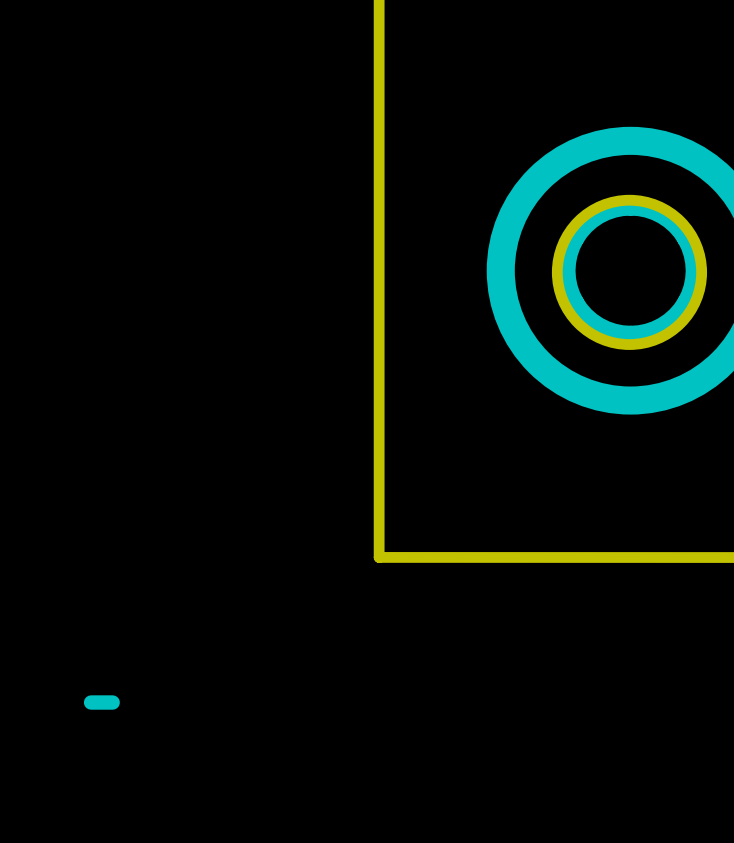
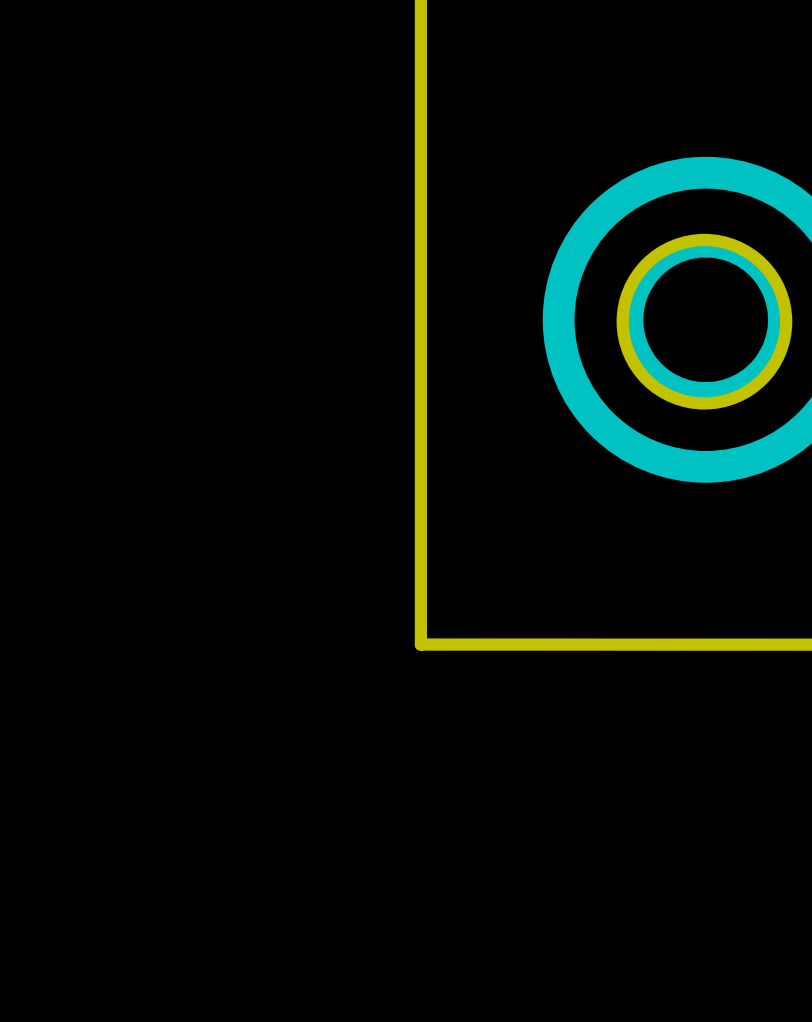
line: (91, 702) (112, 702) -> none

